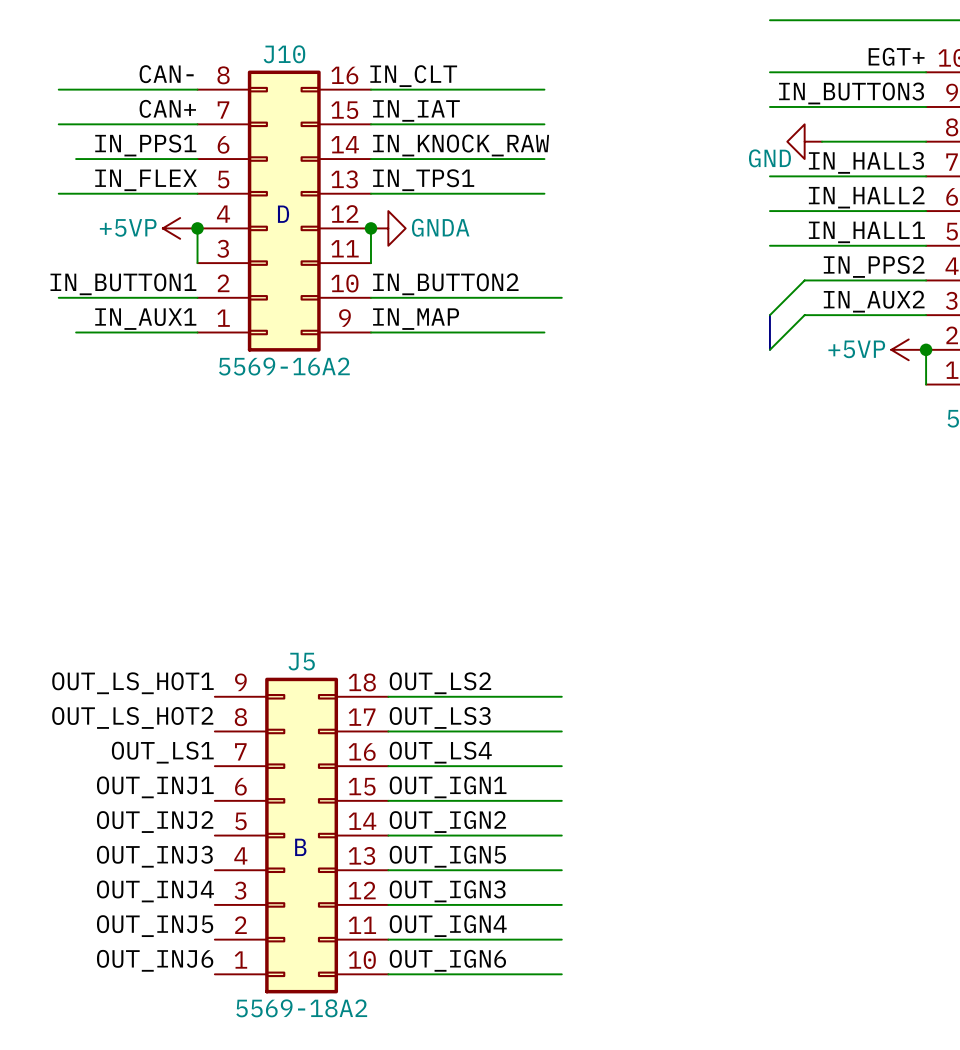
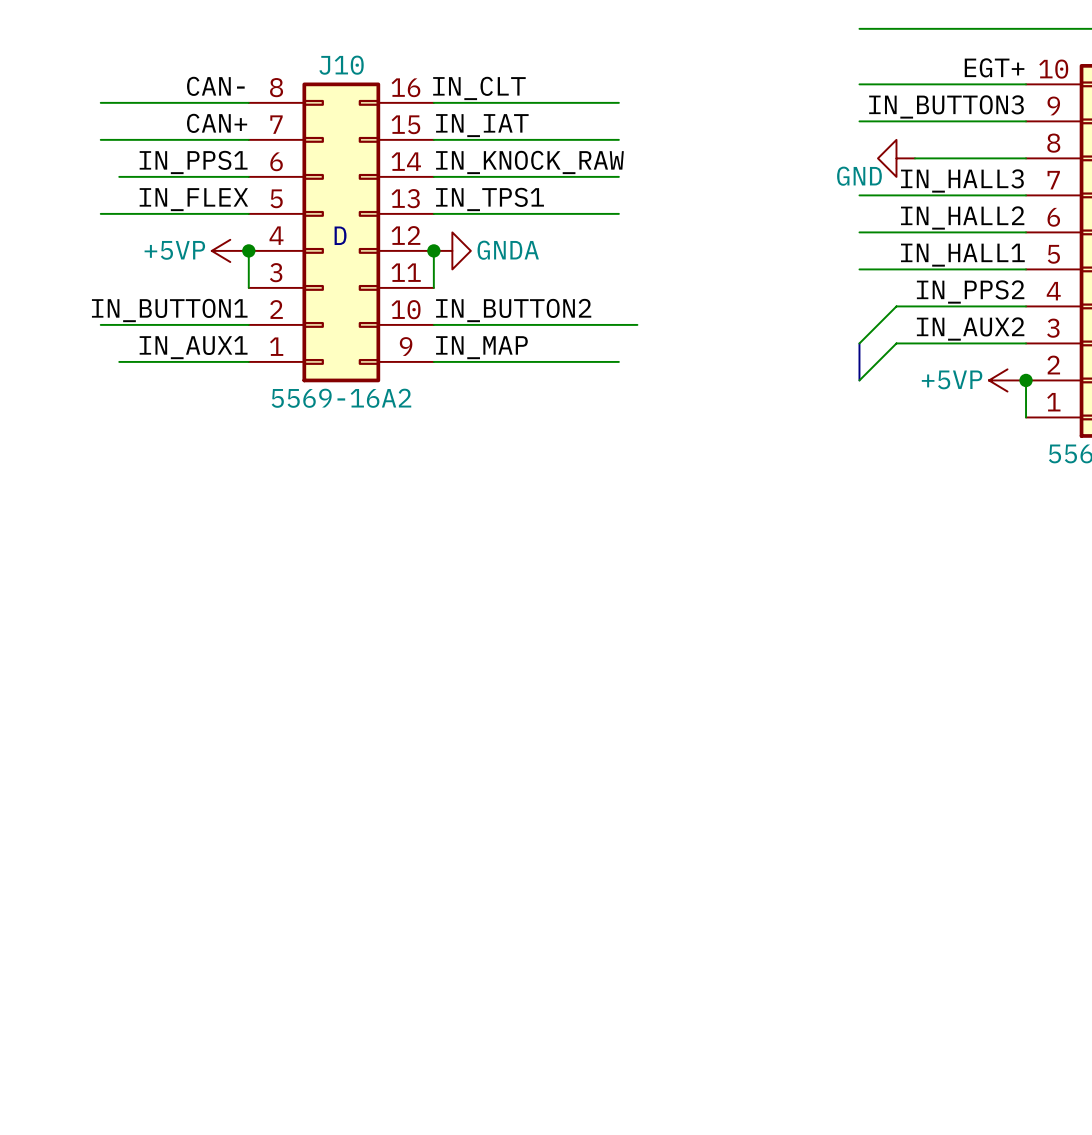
label: OUT_LS_HOT1 (132, 683) -> none
label: OUT_LS2 (440, 683) -> none
wire: (388, 696) (561, 696) -> none
label: OUT_LS_HOT2 (132, 717) -> none
label: OUT_LS3 (440, 717) -> none
wire: (388, 731) (561, 731) -> none
label: OUT_LS1 (162, 752) -> none
label: OUT_LS4 (440, 752) -> none
wire: (388, 766) (561, 766) -> none
label: OUT_INJ1 (155, 787) -> none
label: OUT_IGN1 (448, 787) -> none
wire: (388, 800) (561, 800) -> none
label: OUT_INJ2 (155, 822) -> none
label: OUT_IGN2 (447, 822) -> none
J5: 5569-18A2 (301, 835) -> none
wire: (388, 835) (561, 835) -> none
text: B (300, 847) -> none
label: OUT_INJ3 (154, 856) -> none
label: OUT_IGN5 (447, 856) -> none
wire: (388, 870) (561, 870) -> none
label: OUT_INJ4 (155, 891) -> none
label: OUT_IGN3 (447, 891) -> none
wire: (388, 904) (561, 904) -> none
label: OUT_INJ5 (155, 926) -> none
label: OUT_IGN4 (448, 926) -> none
wire: (388, 939) (561, 939) -> none
label: OUT_INJ6 (155, 960) -> none
label: OUT_IGN6 (447, 960) -> none
wire: (388, 974) (561, 974) -> none

